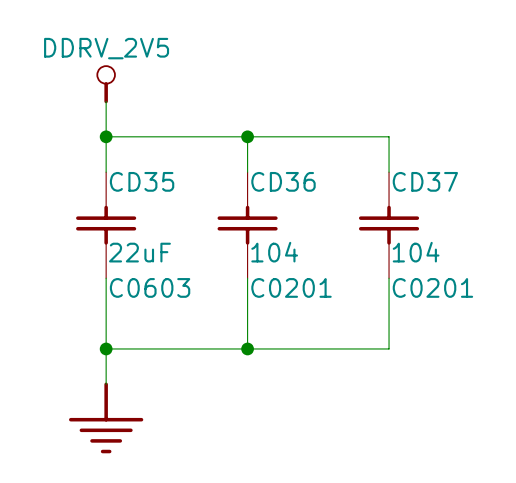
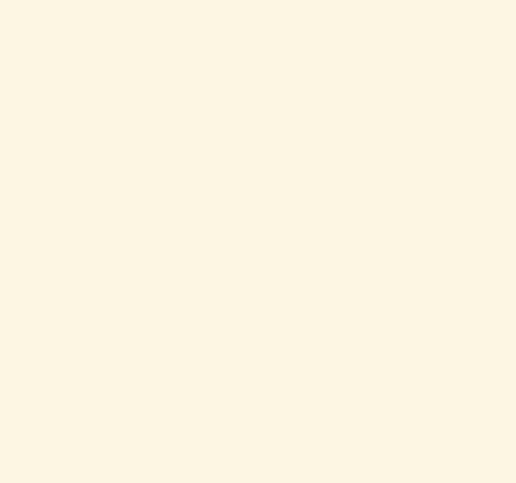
power symbol: DDRV_2V5 (106, 84) -> none
wire: (106, 101) (106, 172) -> none
wire: (106, 136) (389, 136) (389, 172) -> none
junction: (106, 136) -> none
wire: (247, 136) (247, 172) -> none
junction: (247, 136) -> none
CD35: 22uF (106, 225) -> none
CD36: 104 (247, 225) -> none
CD37: 104 (389, 225) -> none
wire: (106, 278) (106, 384) -> none
wire: (247, 278) (247, 348) -> none
wire: (389, 278) (389, 348) (106, 348) -> none
junction: (106, 348) -> none
junction: (247, 348) -> none
power symbol: (106, 417) -> none

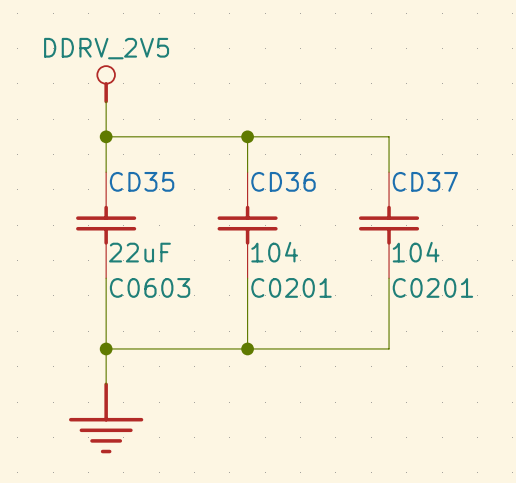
power symbol: none -> DDRV_2V5 (106, 84)
wire: none -> (106, 101) (106, 172)
wire: none -> (106, 136) (389, 136) (389, 172)
junction: none -> (106, 136)
wire: none -> (247, 136) (247, 172)
junction: none -> (247, 136)
CD35: none -> 22uF (106, 225)
CD36: none -> 104 (247, 225)
CD37: none -> 104 (389, 225)
wire: none -> (106, 278) (106, 384)
wire: none -> (247, 278) (247, 348)
wire: none -> (389, 278) (389, 348) (106, 348)
junction: none -> (106, 348)
junction: none -> (247, 348)
power symbol: none -> (106, 417)

